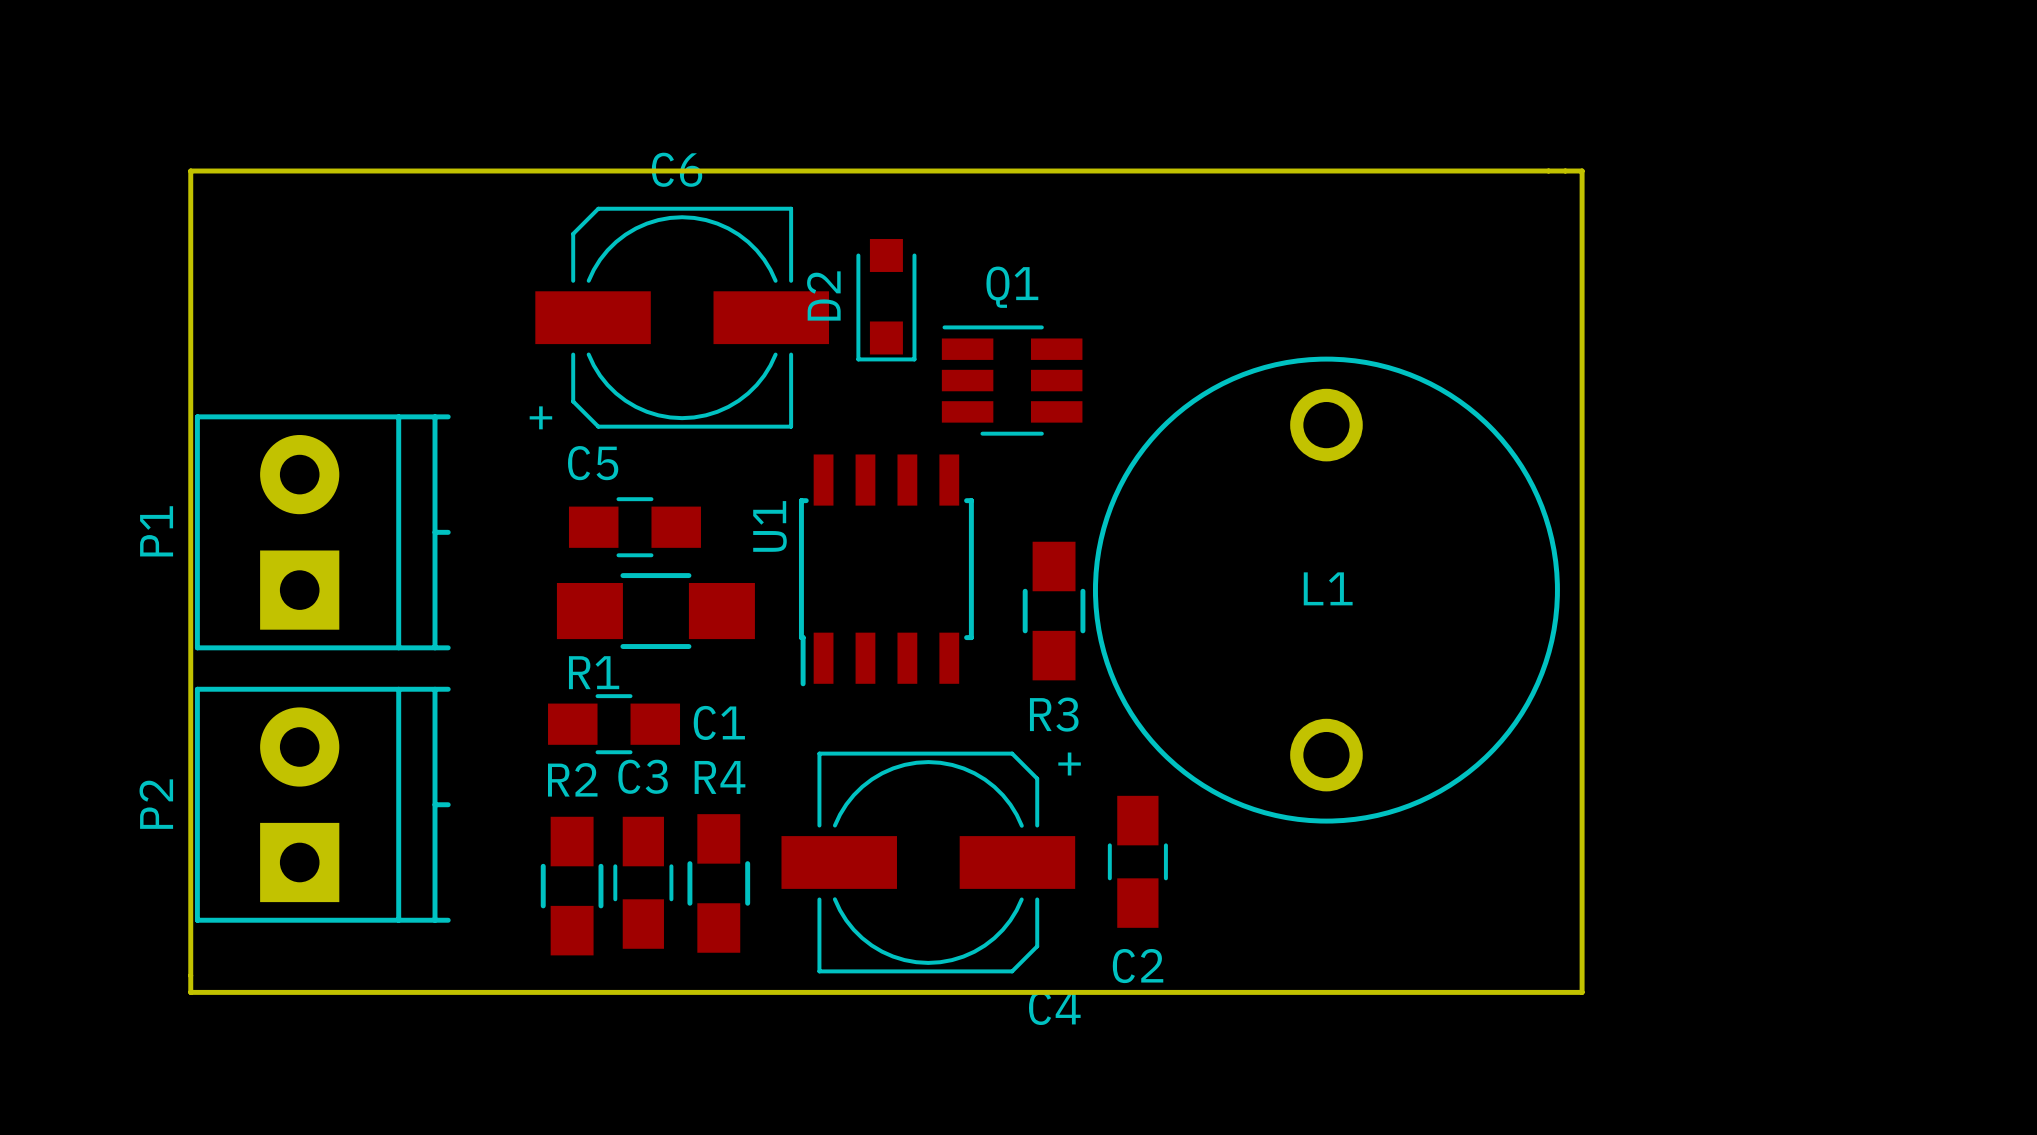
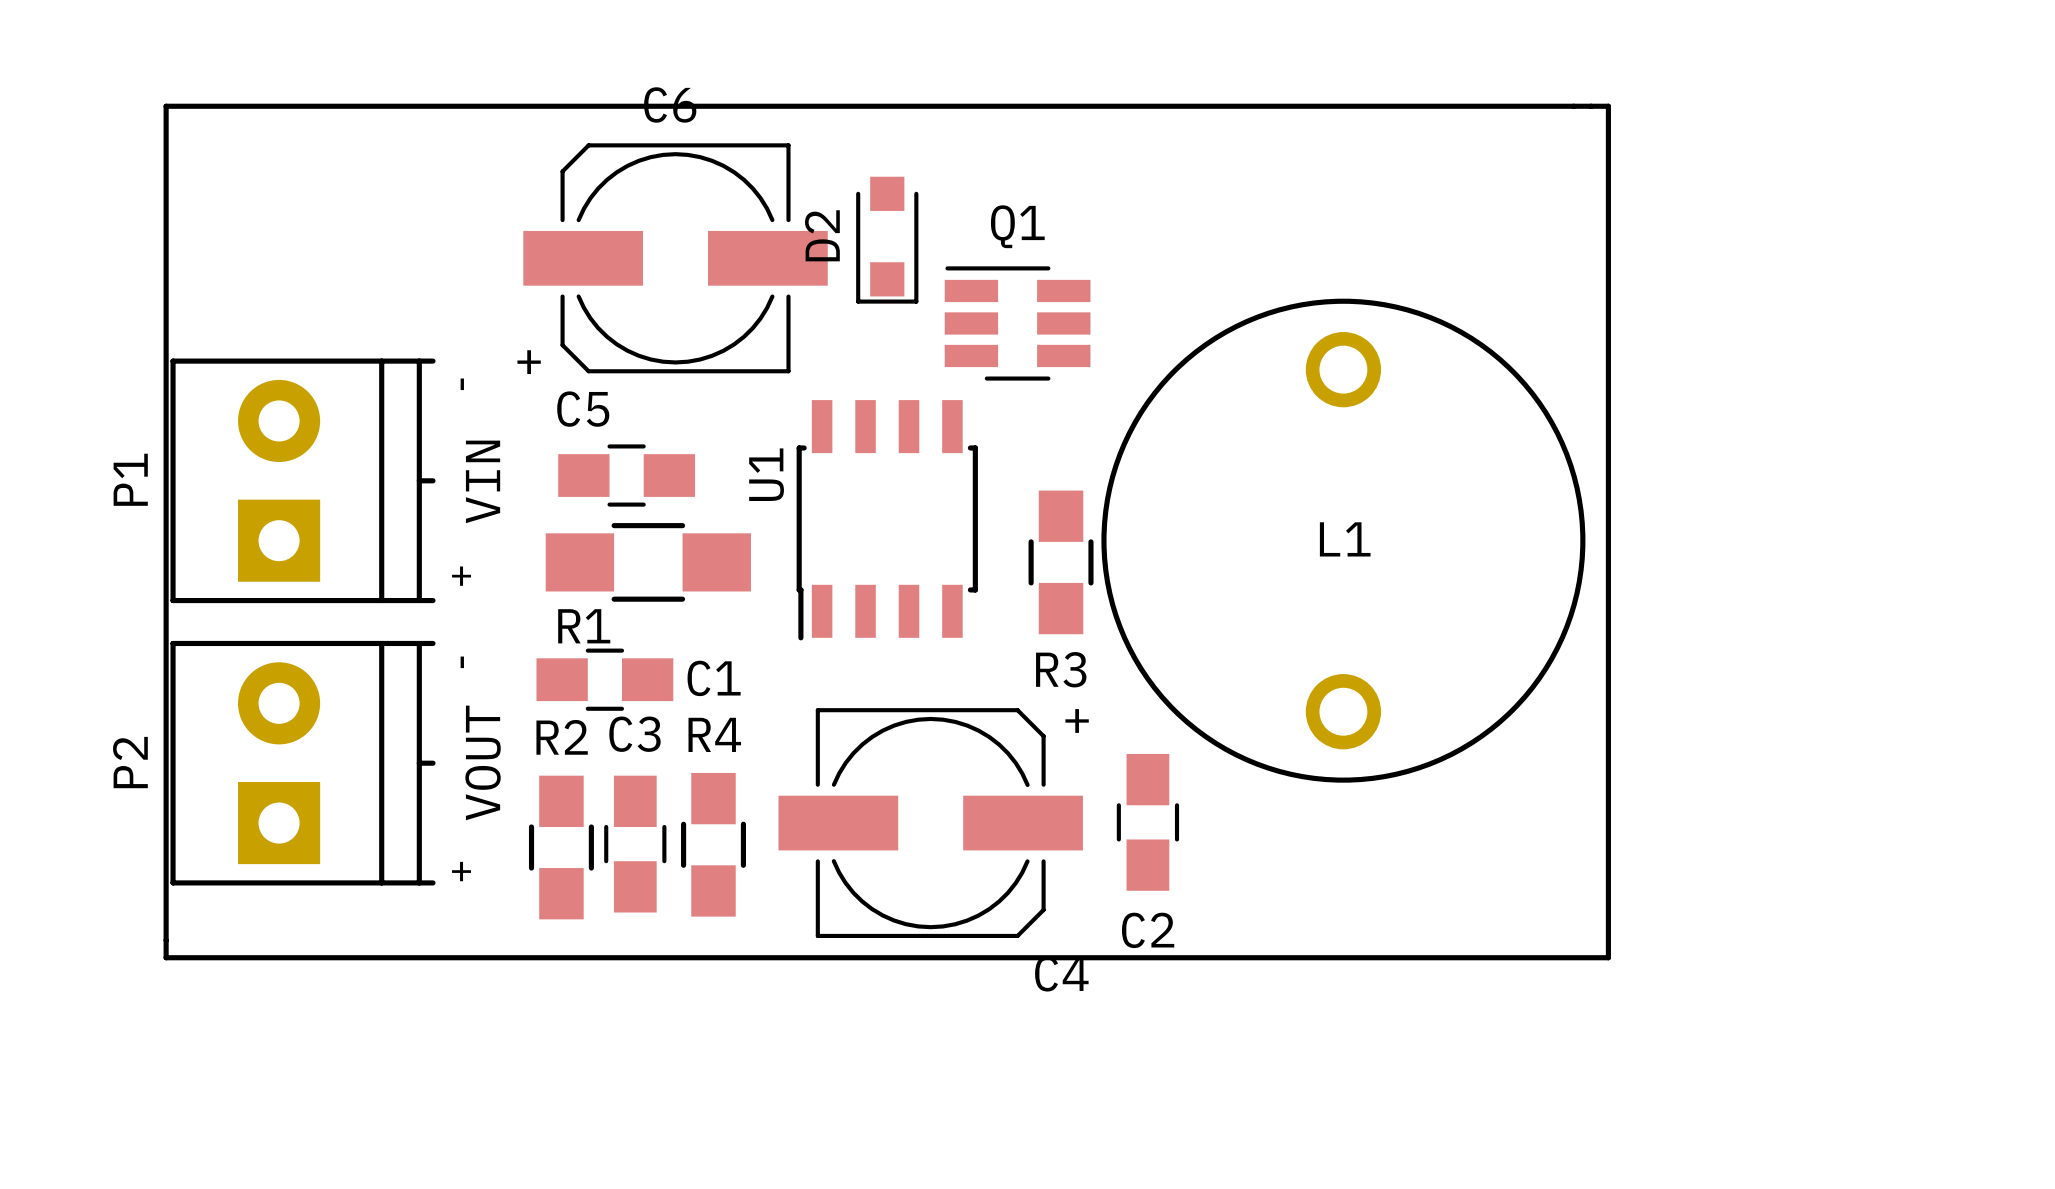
text: none -> - (462, 384)
P1 value: none -> VIN (483, 481)
text: none -> + (461, 576)
text: none -> - (462, 662)
P2 value: none -> VOUT (483, 762)
text: none -> + (461, 871)

